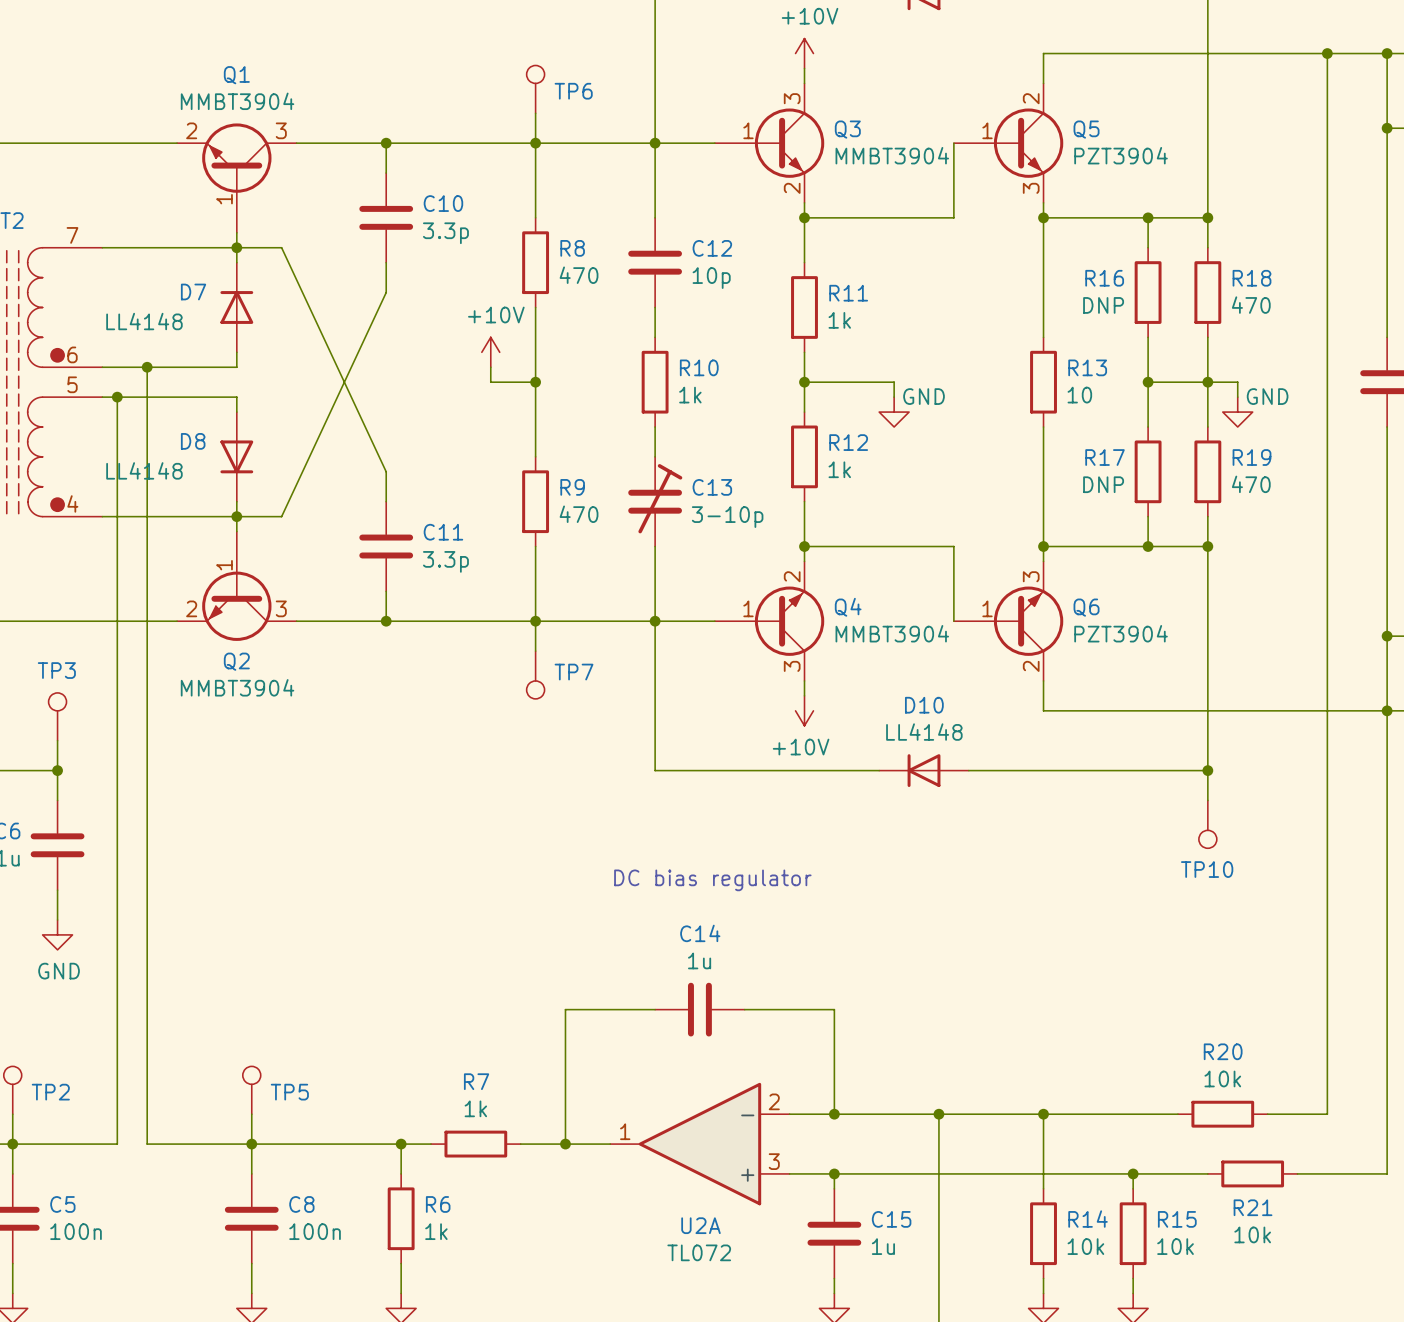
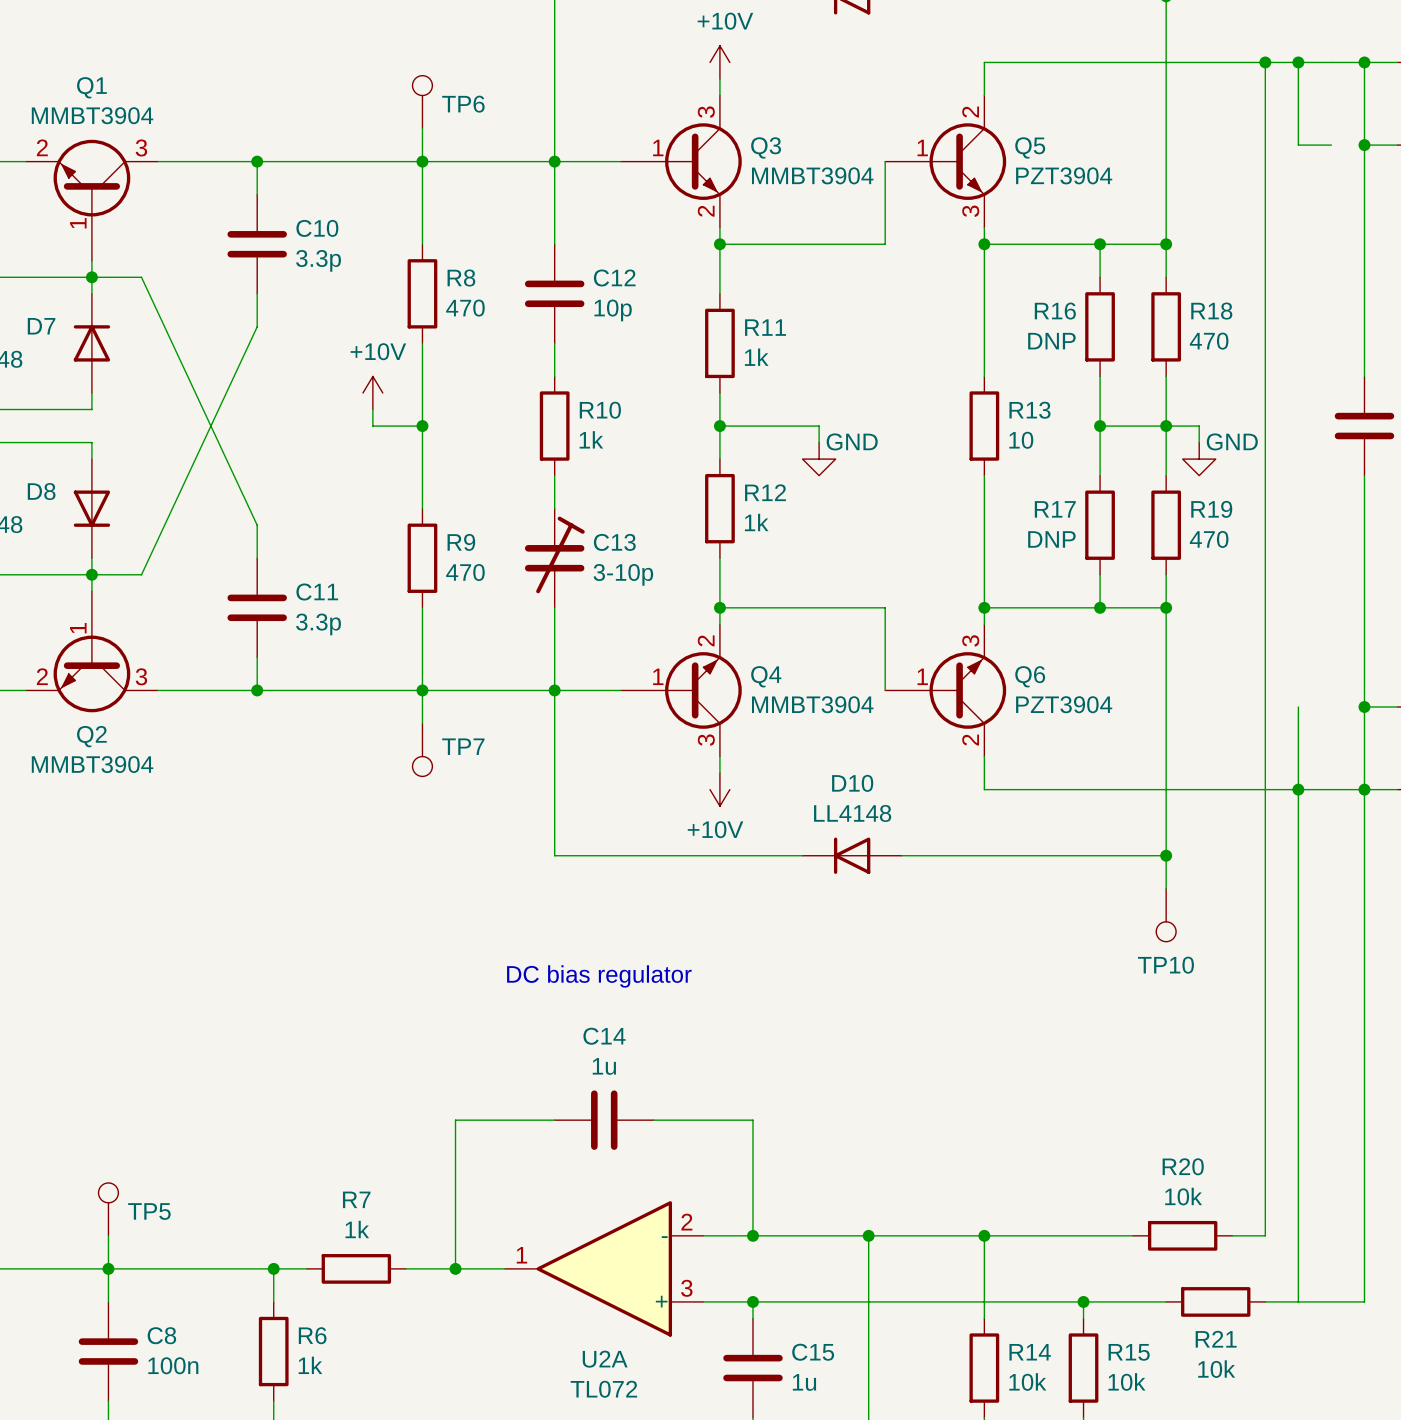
wire: none -> (1265, 62) (1265, 1235)
junction: none -> (1265, 62)
wire: (1327, 128) (1327, 636) -> (1298, 145) (1331, 145)
junction: none -> (1298, 789)
wire: (1297, 1114) (1327, 1114) -> (1298, 1301) (1298, 1235)

